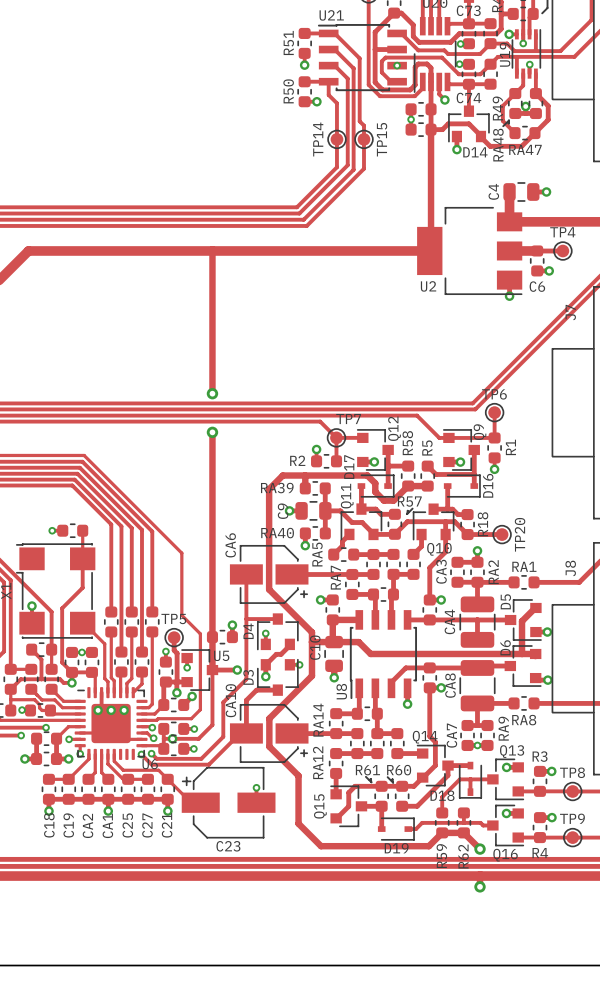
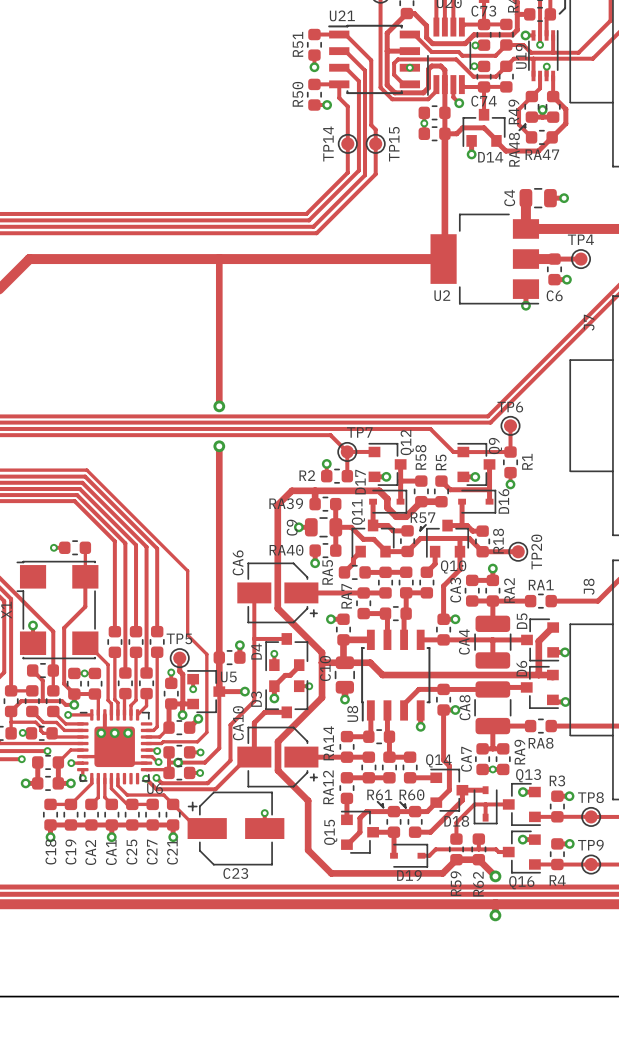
track: none -> (68, 714) (91, 714)
via: none -> (68, 714)

